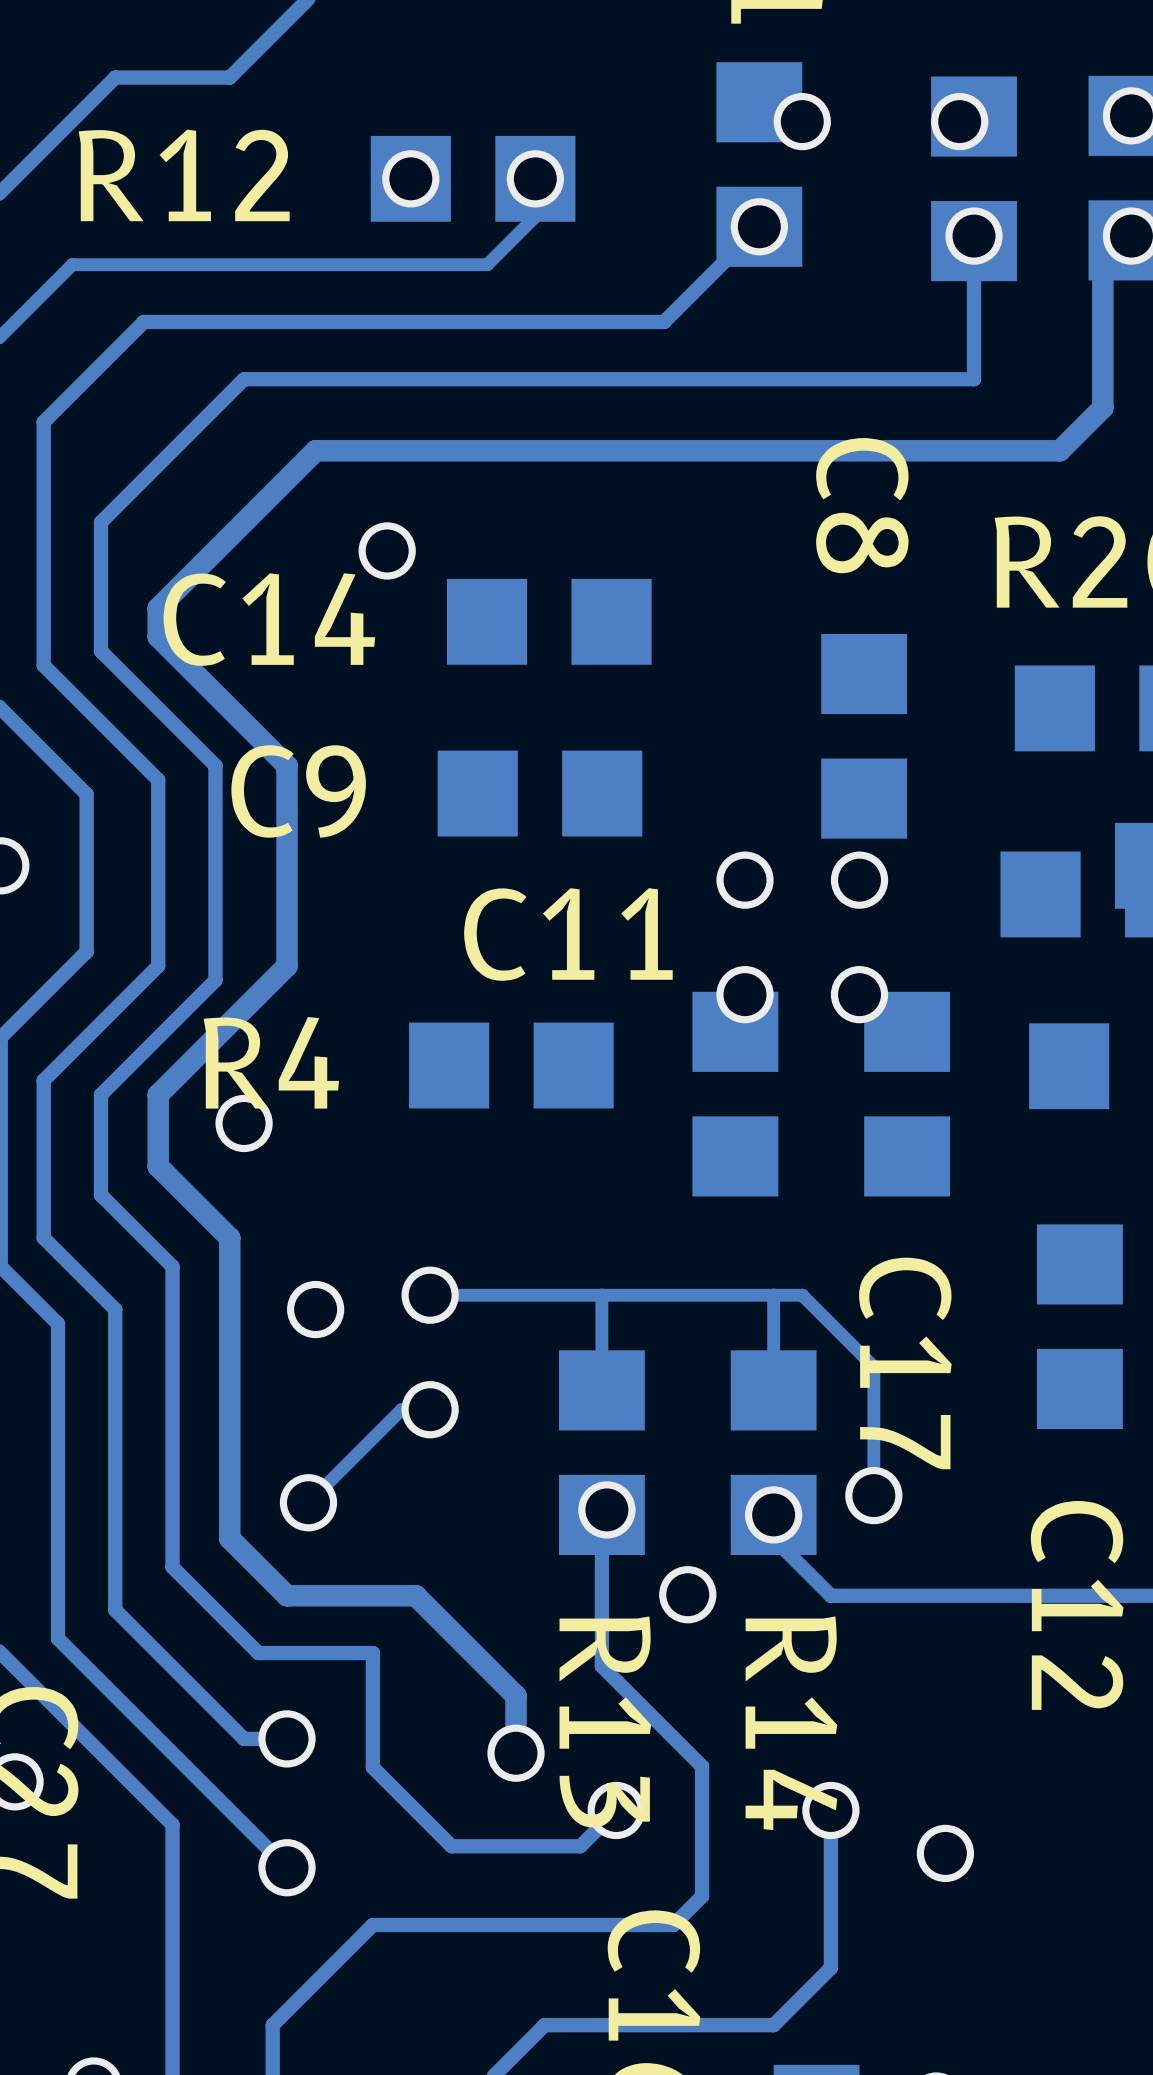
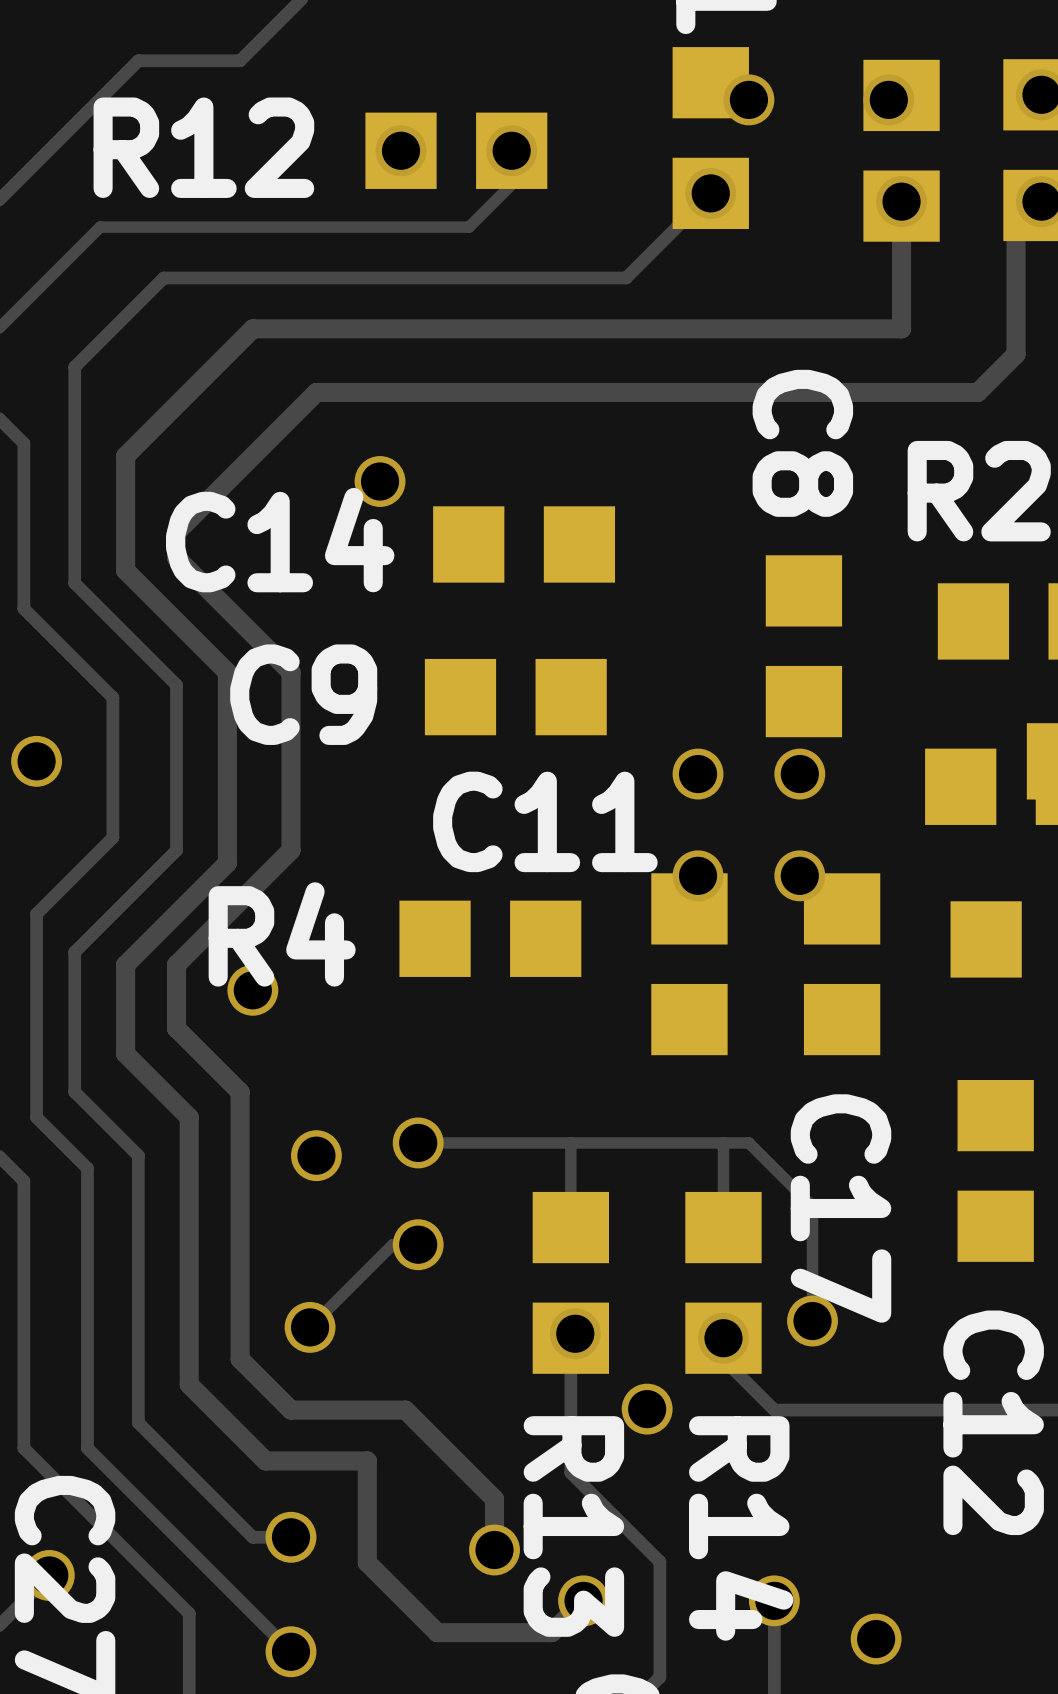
track width: thin (974, 236) (974, 379) (244, 379) (100, 522) (100, 651) (215, 765) (215, 980) (100, 1094) (100, 1195) (172, 1266) (172, 1567) (258, 1653) (372, 1653) (372, 1767) (451, 1846) (580, 1846) (616, 1810) -> thick (901, 201) (901, 328) (252, 328) (125, 456) (125, 570) (227, 672) (227, 863) (125, 964) (125, 1053) (189, 1117) (189, 1384) (265, 1460) (367, 1460) (367, 1562) (437, 1632) (551, 1632) (583, 1600)

